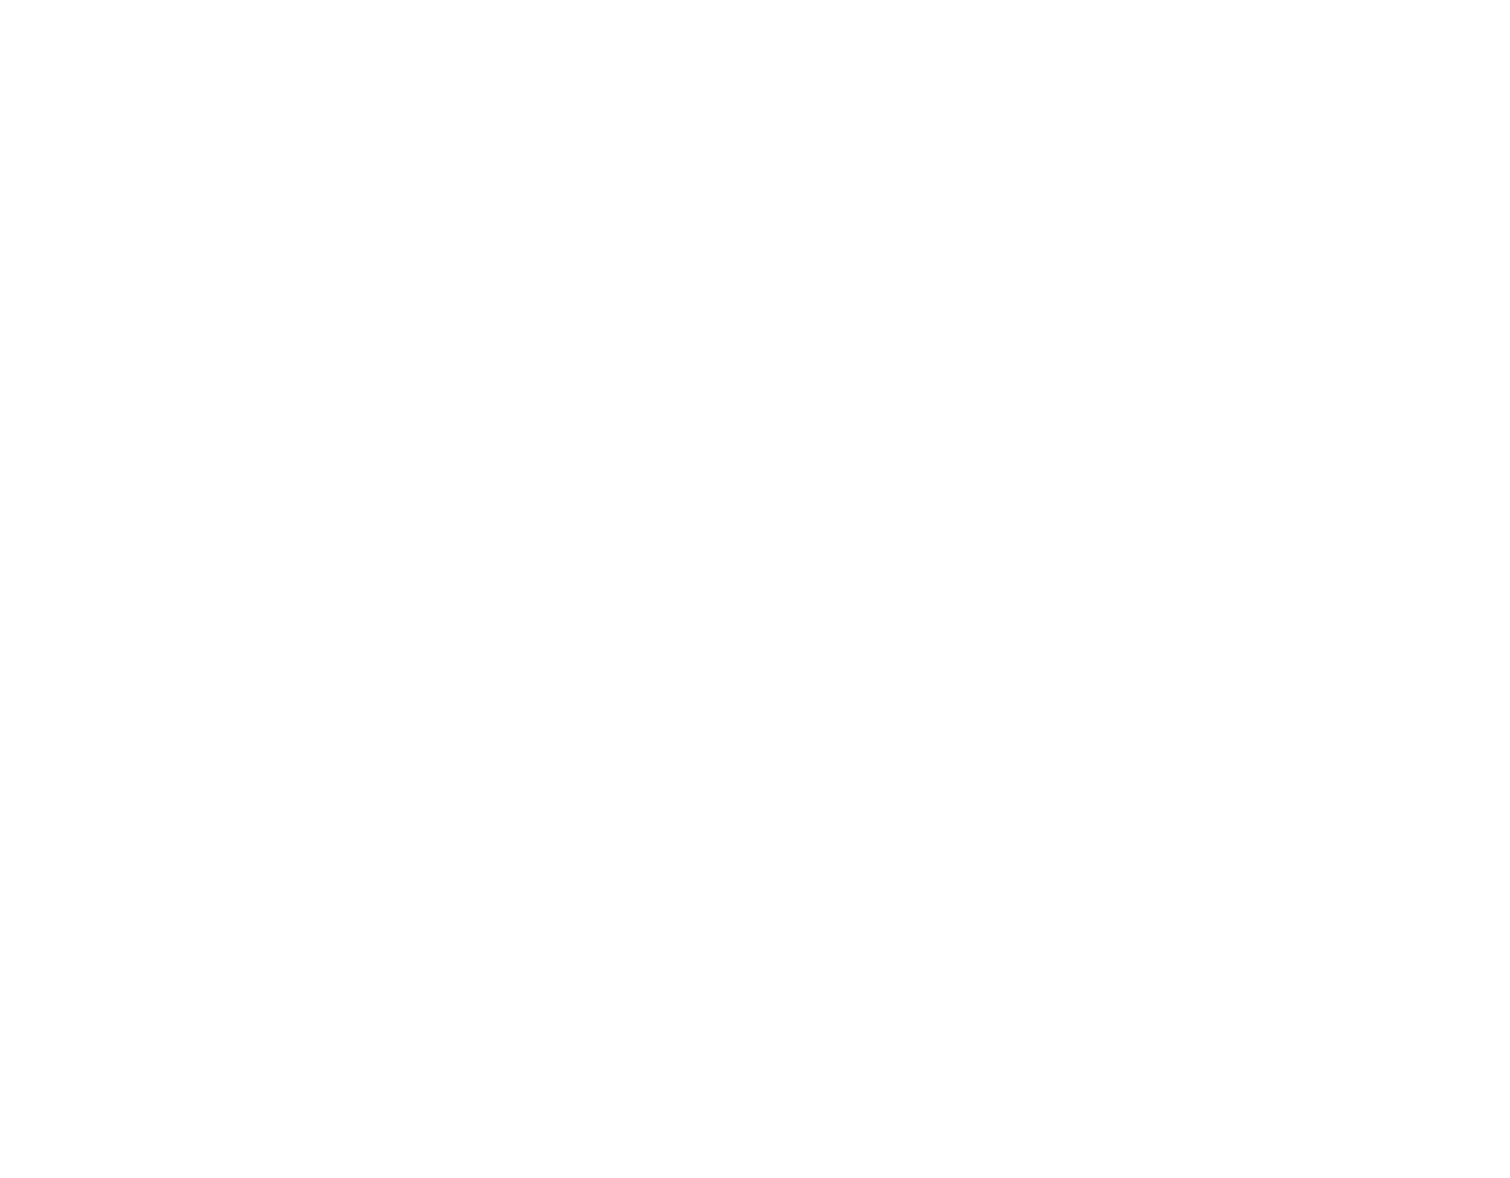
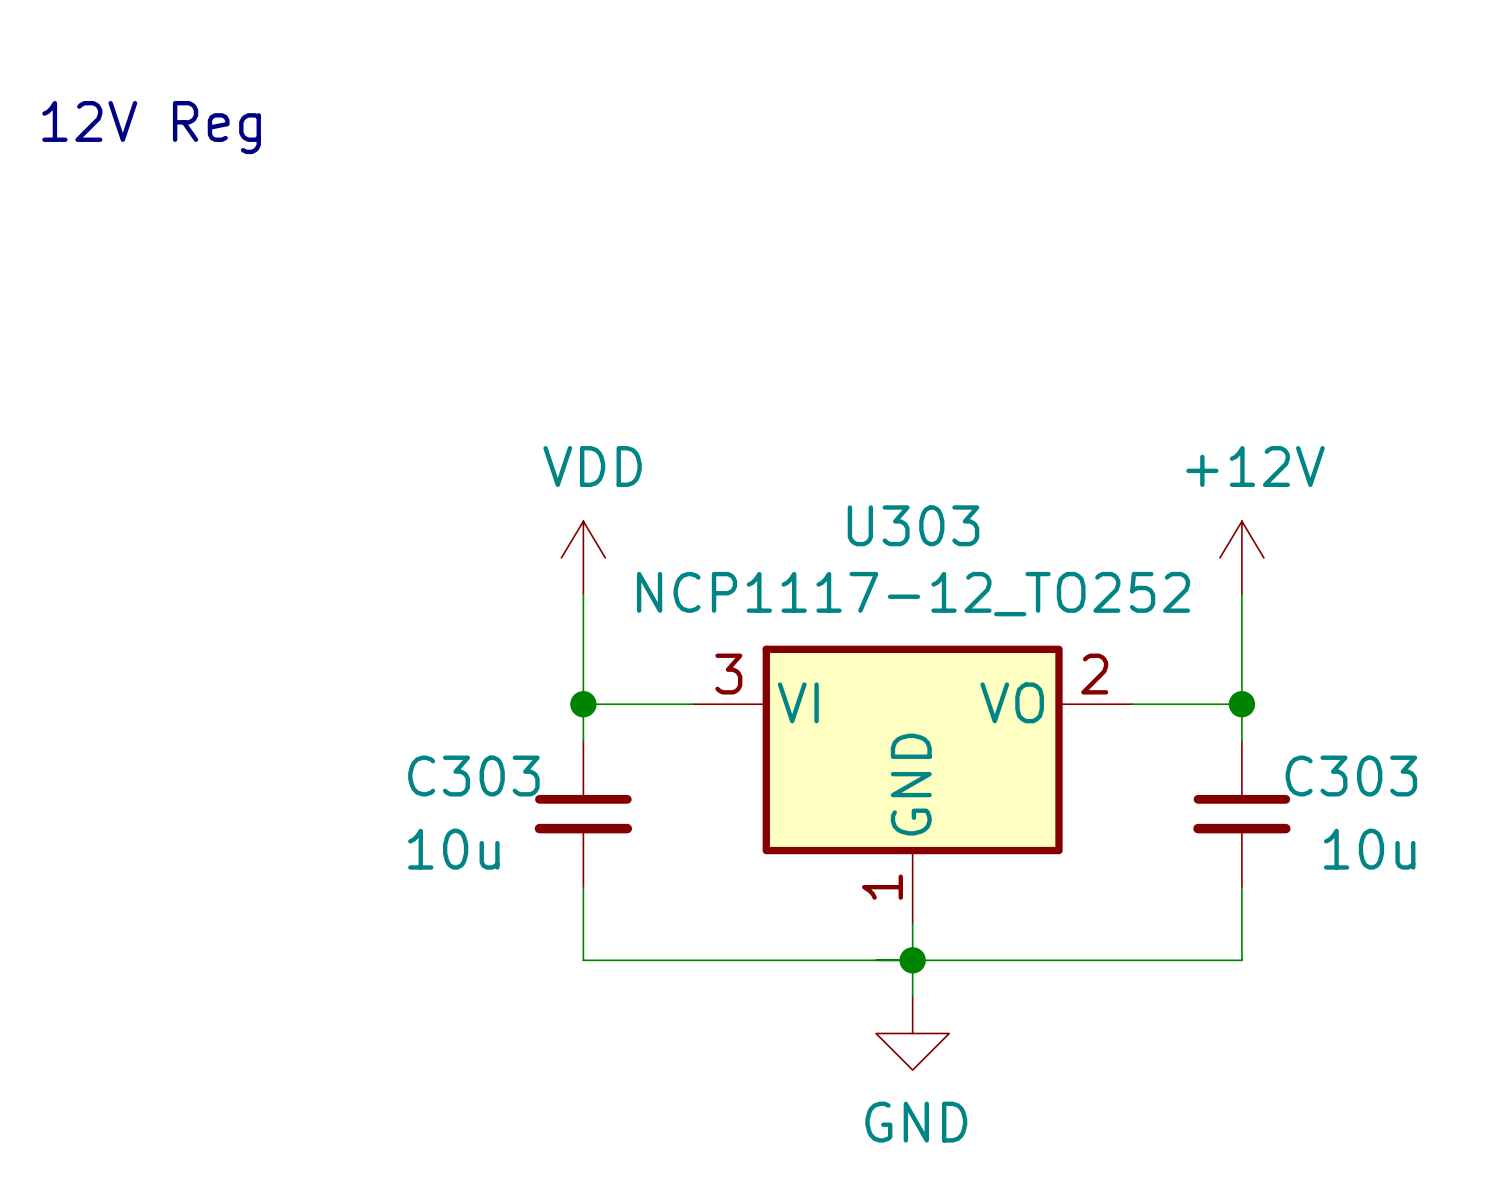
text: none -> 12V Reg (151, 127)
power symbol: none -> VDD (583, 557)
power symbol: none -> +12V (1241, 557)
wire: none -> (583, 594) (583, 740)
wire: none -> (1241, 594) (1241, 740)
wire: none -> (583, 704) (693, 704)
junction: none -> (583, 704)
wire: none -> (1132, 704) (1241, 704)
junction: none -> (1241, 704)
U303: none -> NCP1117-12_TO252 (912, 784)
C303: none -> 10u (583, 813)
C303: none -> 10u (1241, 813)
wire: none -> (583, 887) (583, 960) (1241, 960) (1241, 887)
wire: none -> (912, 923) (912, 996)
junction: none -> (912, 960)
power symbol: none -> GND (912, 1033)

